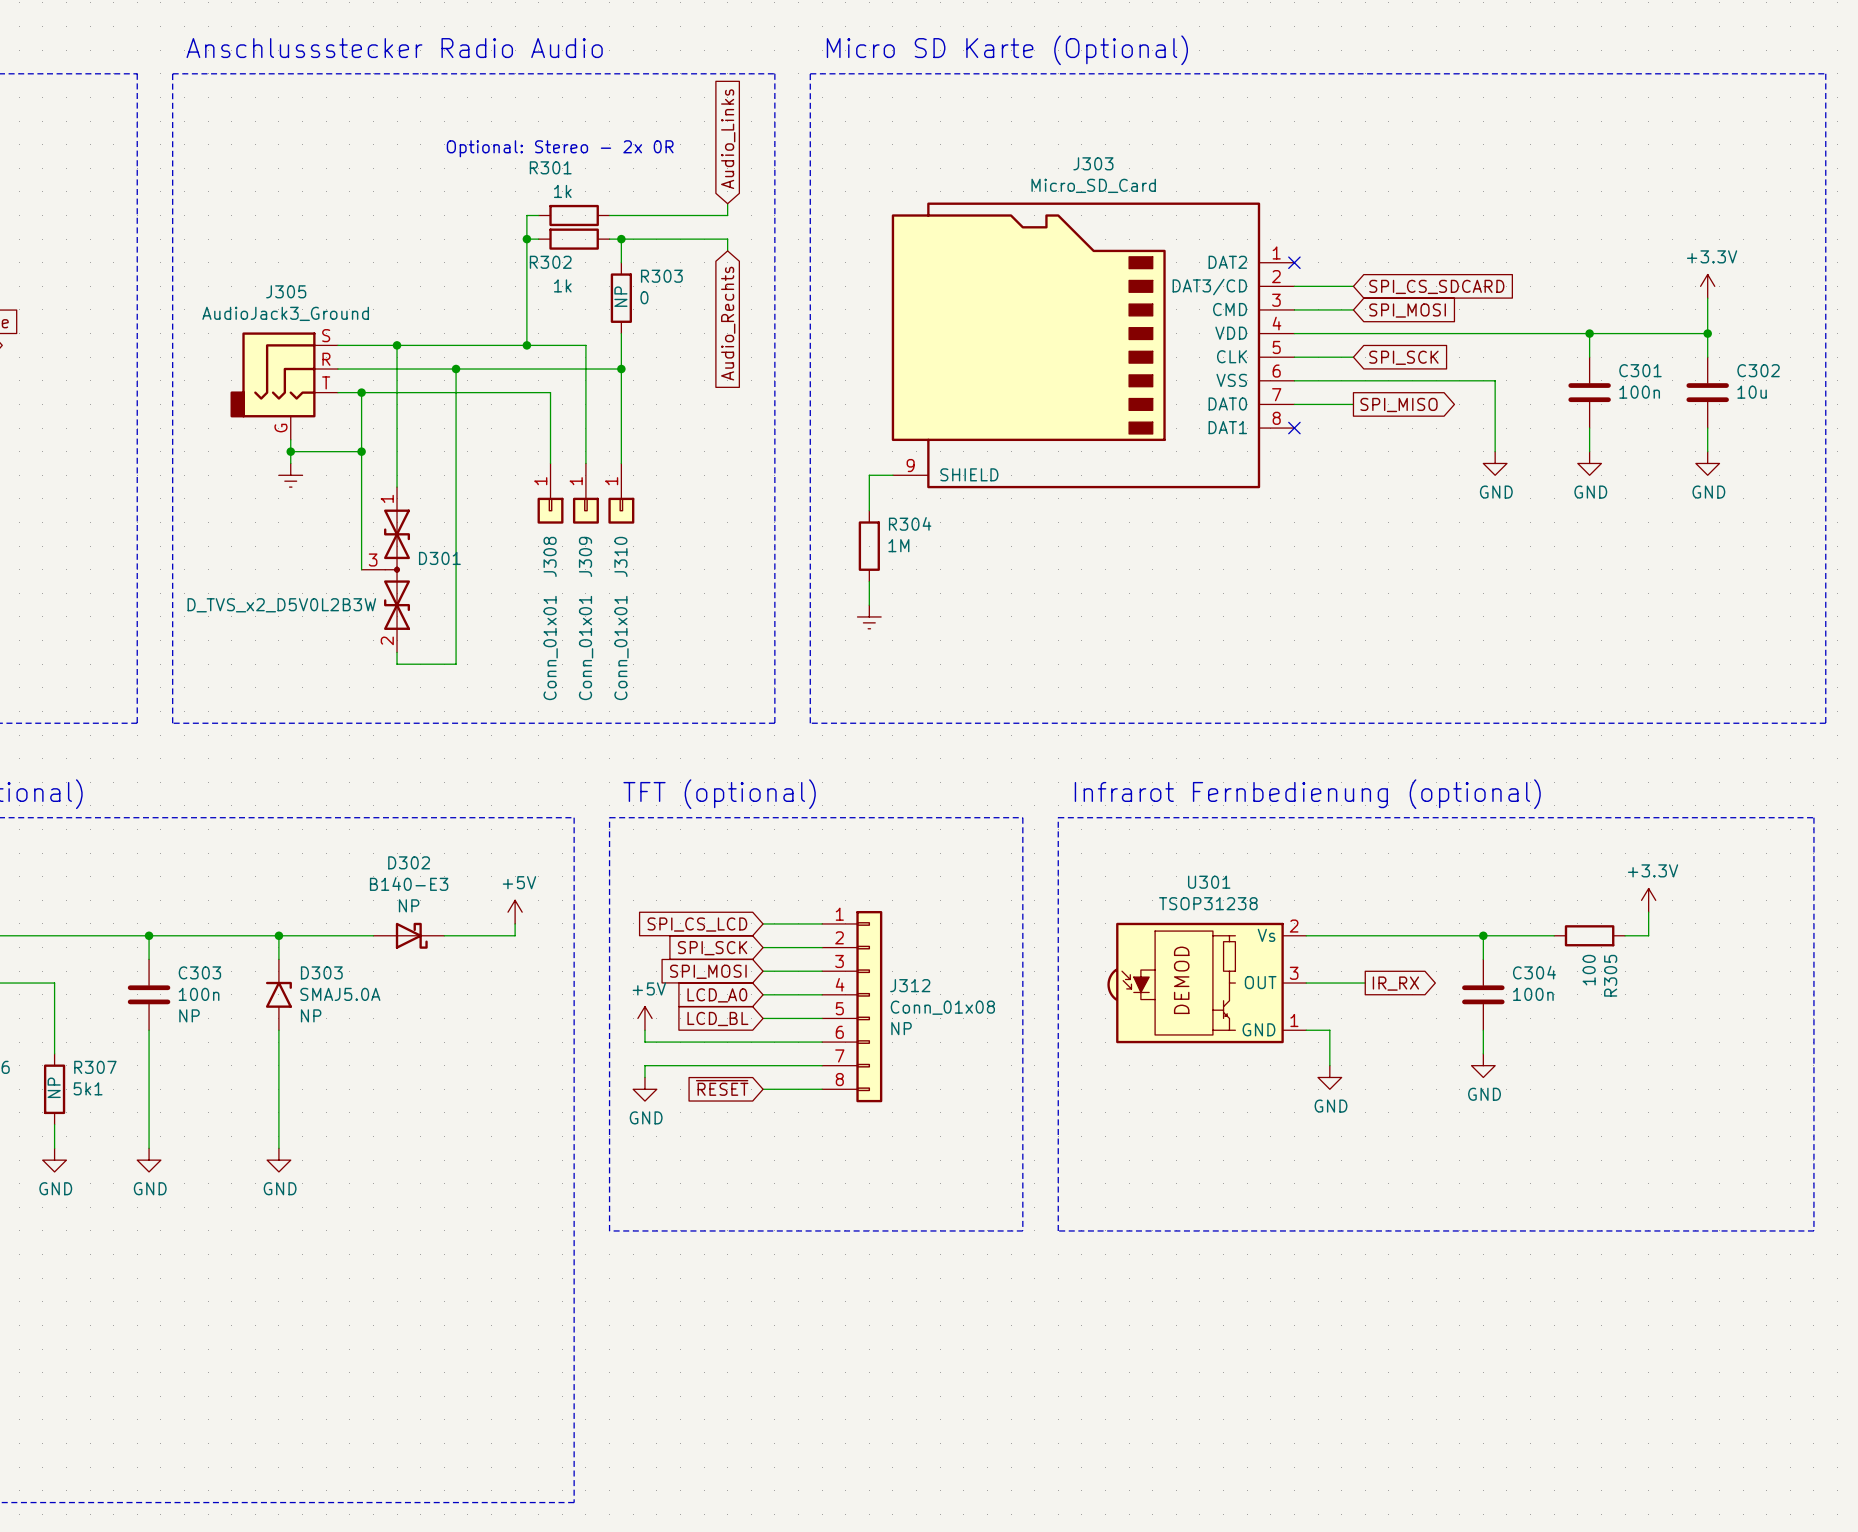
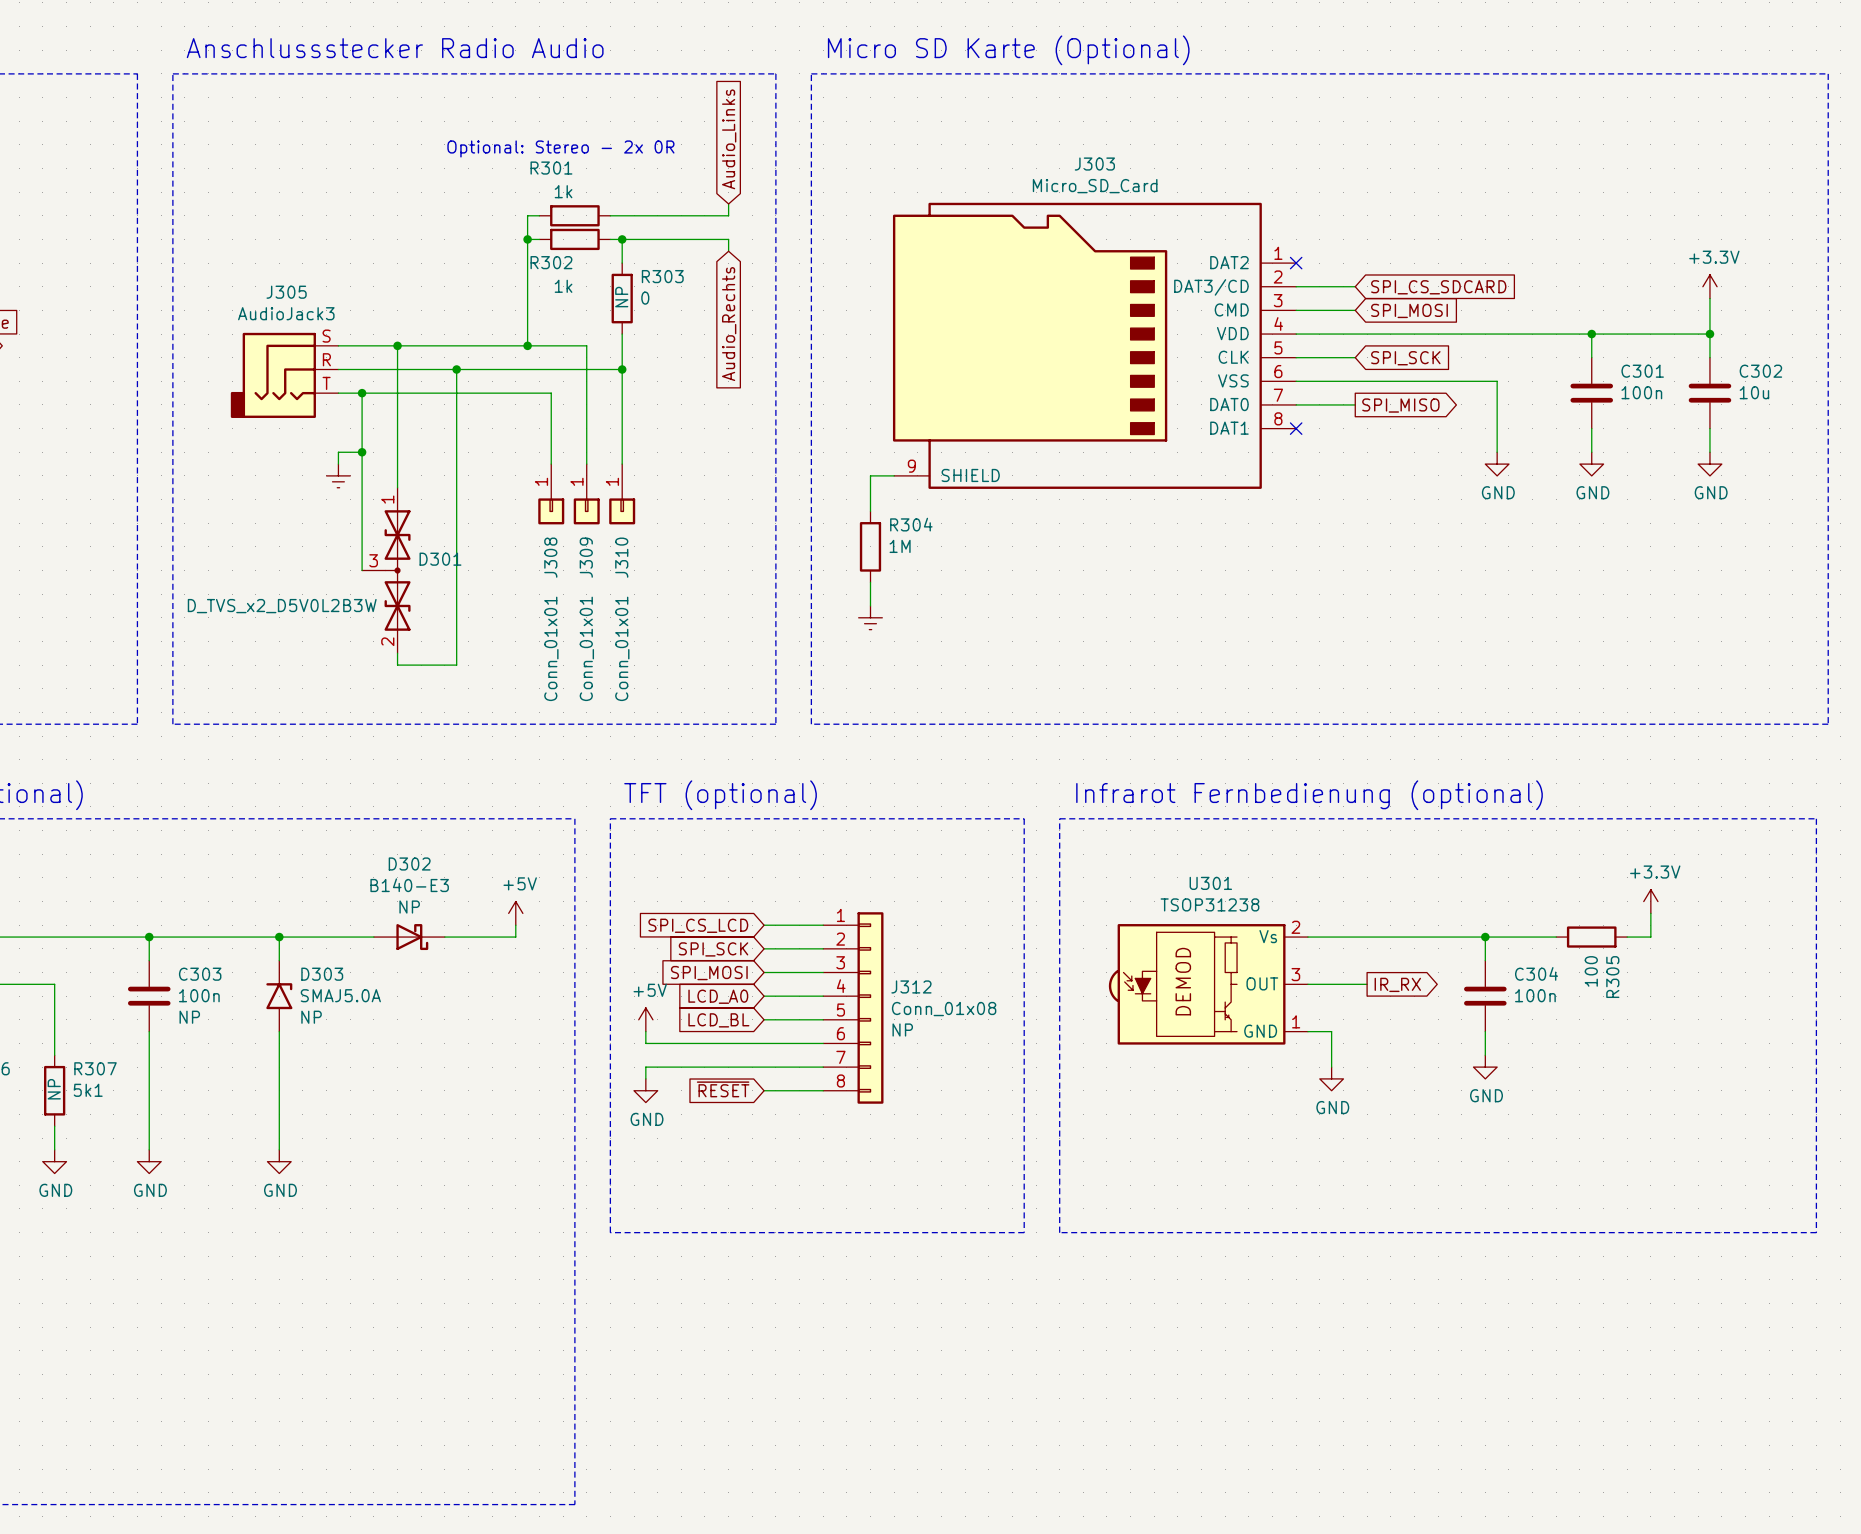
J305 value: AudioJack3_Ground (285, 313) -> AudioJack3 (286, 313)
J305 symbol: [230, 332, 338, 440] -> [230, 332, 339, 418]
wire: (290, 439) (290, 463) -> none
wire: (290, 451) (337, 451) -> (338, 464) (338, 452)
junction: (290, 451) -> none
power symbol position: (290, 475) -> (338, 475)

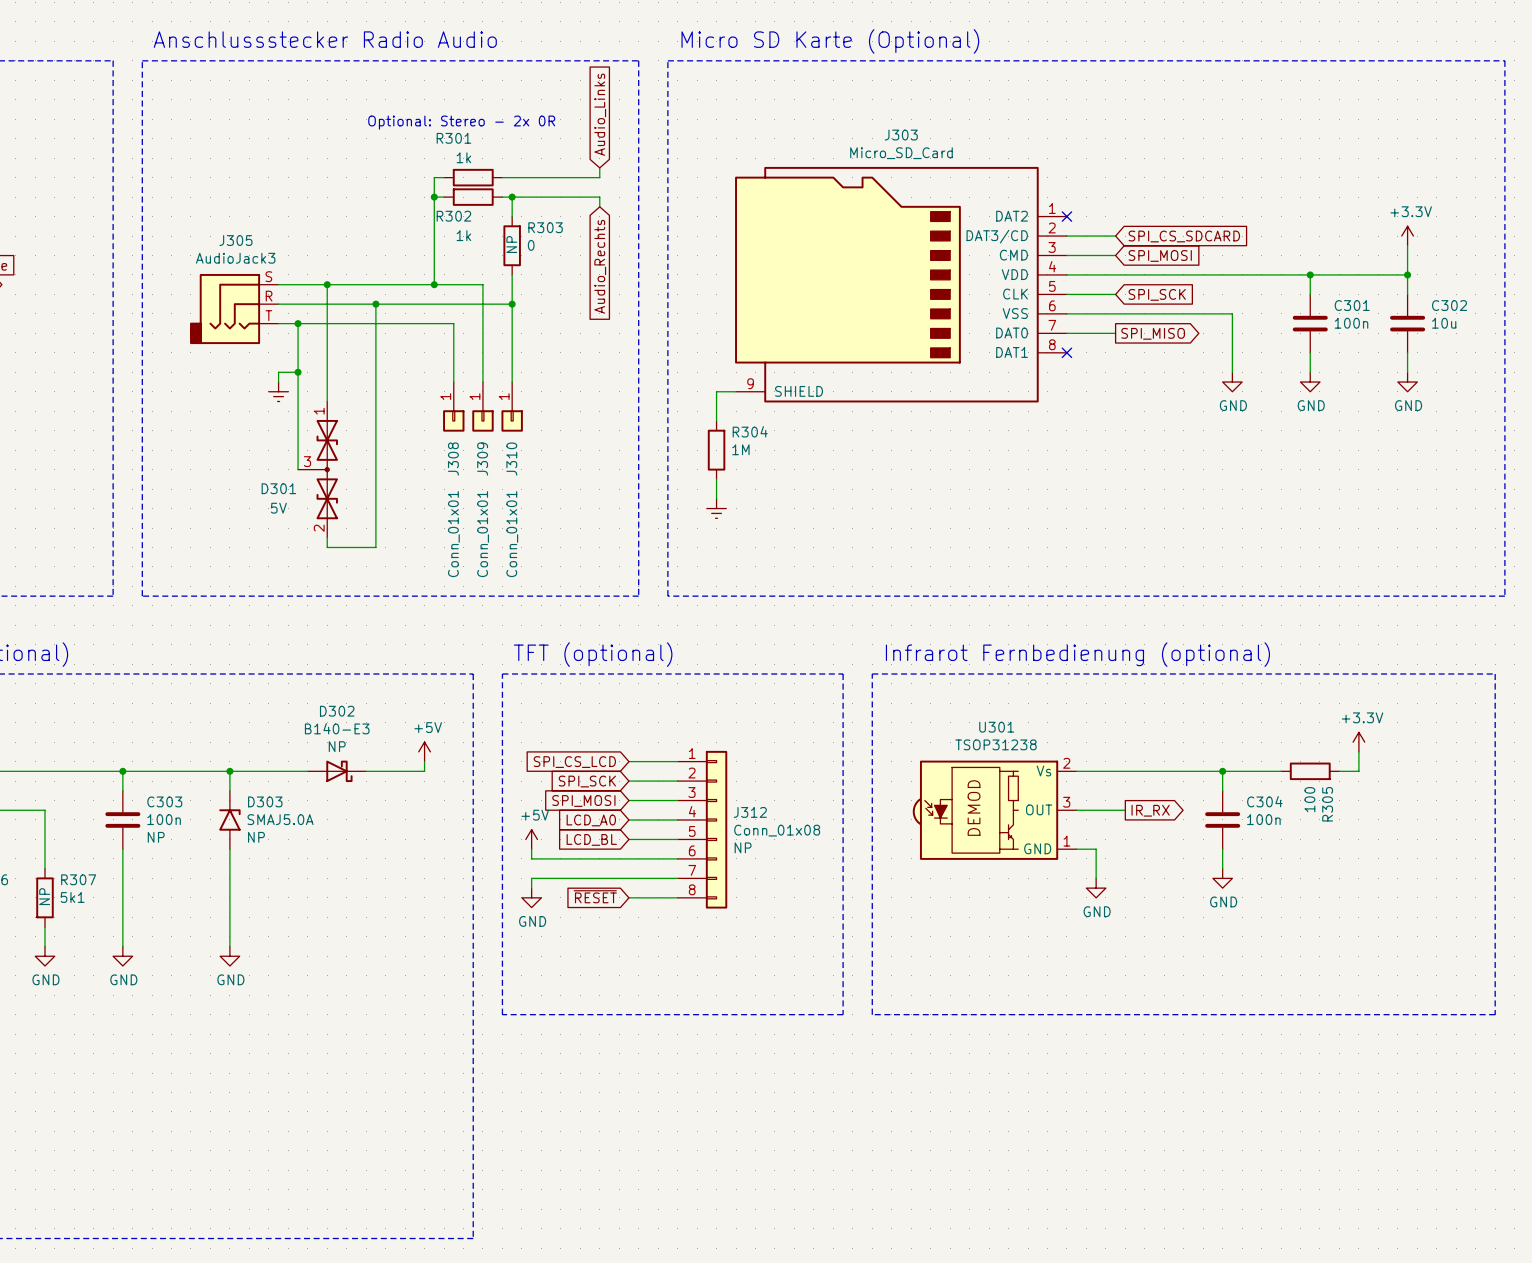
D301 name position: D301 (440, 559) -> D301 (278, 488)
D301 value: D_TVS_x2_D5V0L2B3W (282, 606) -> 5V (278, 508)

